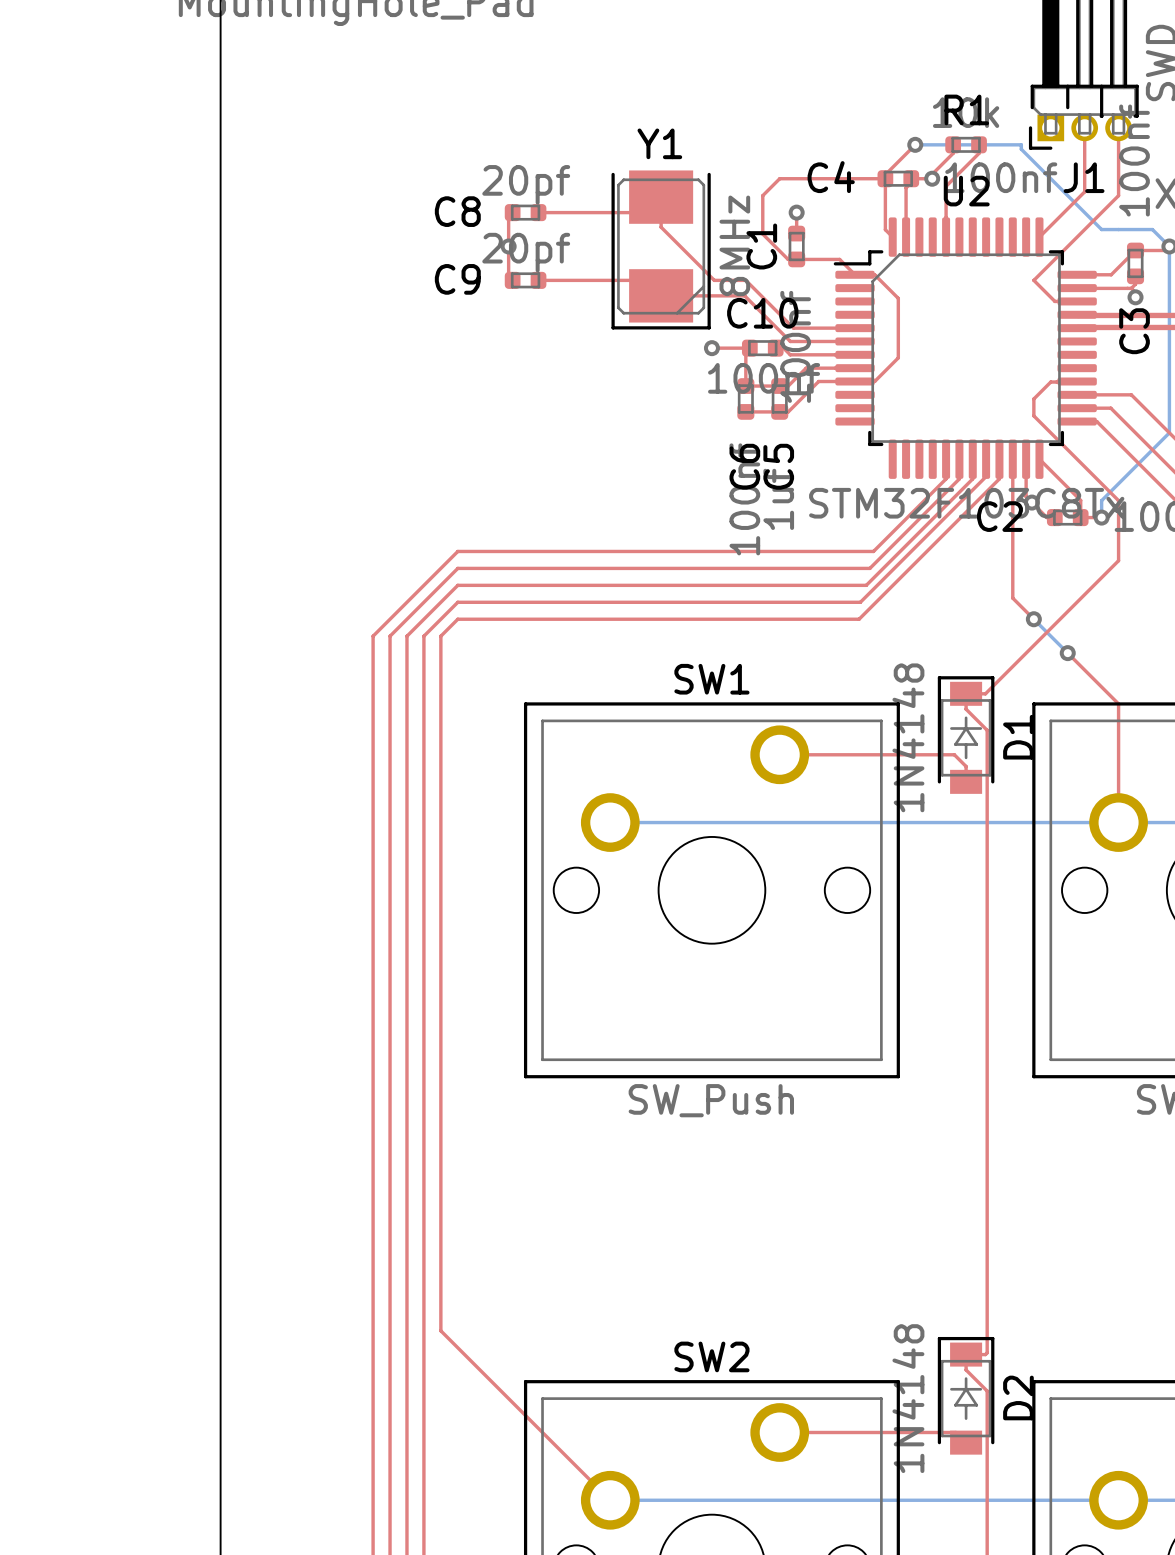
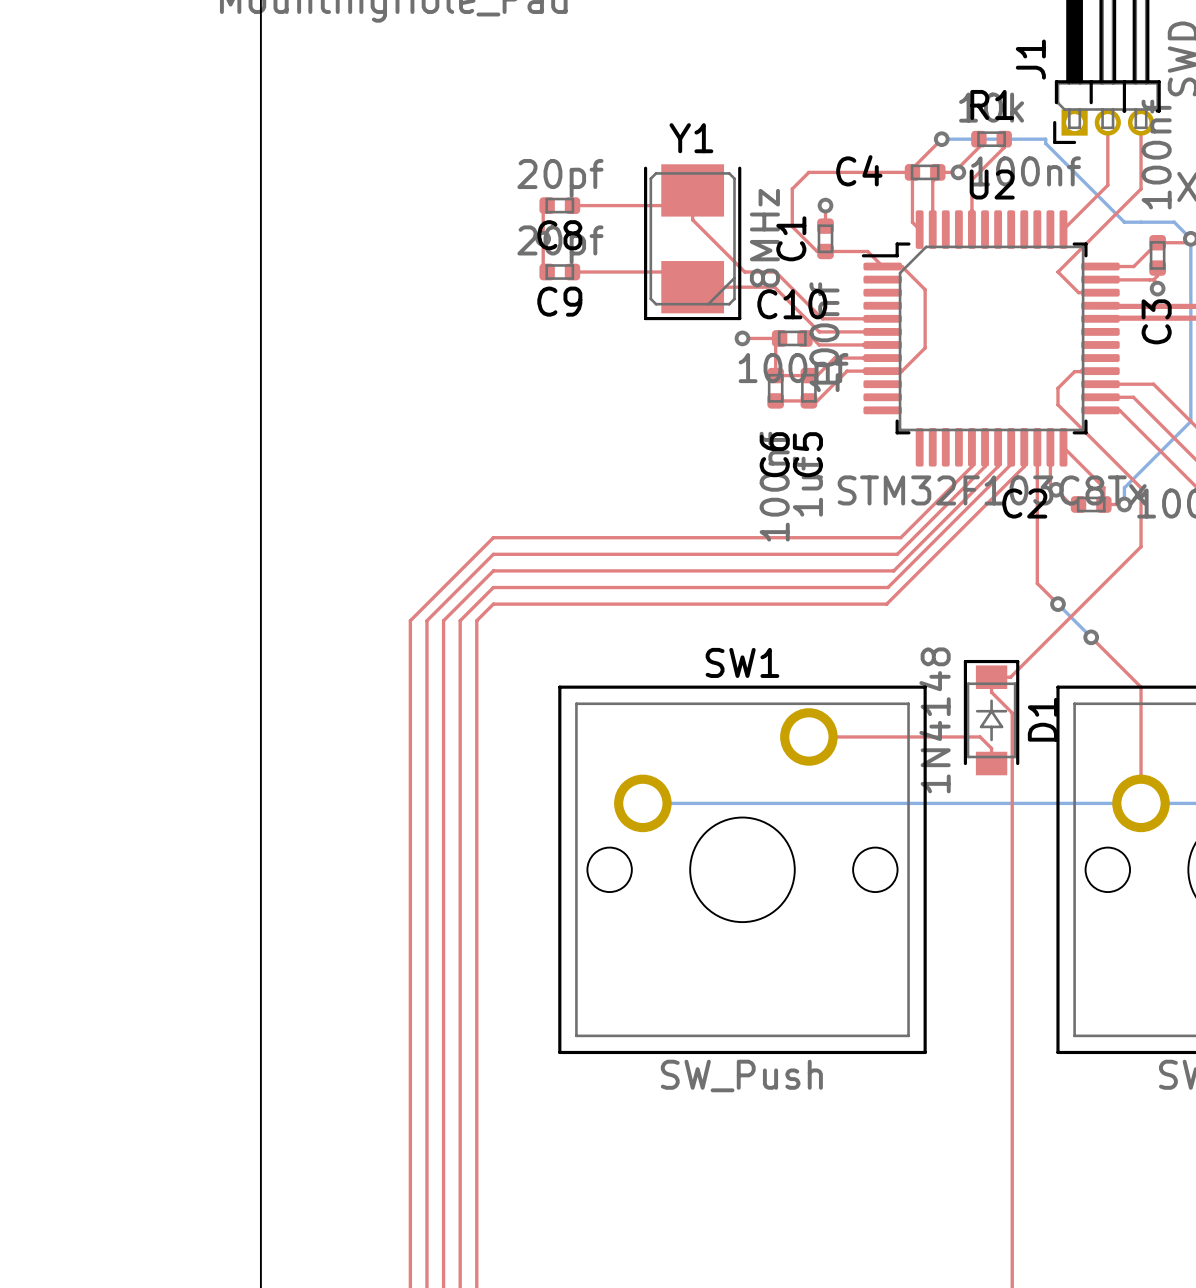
J1 name rotation: 0° (1084, 177) -> 90° counterclockwise (1030, 59)
J1 name position: J1 (1084, 177) -> J1 (1030, 59)
C8 name position: C8 (457, 211) -> C8 (559, 235)
C9 name position: C9 (457, 279) -> C9 (559, 301)

